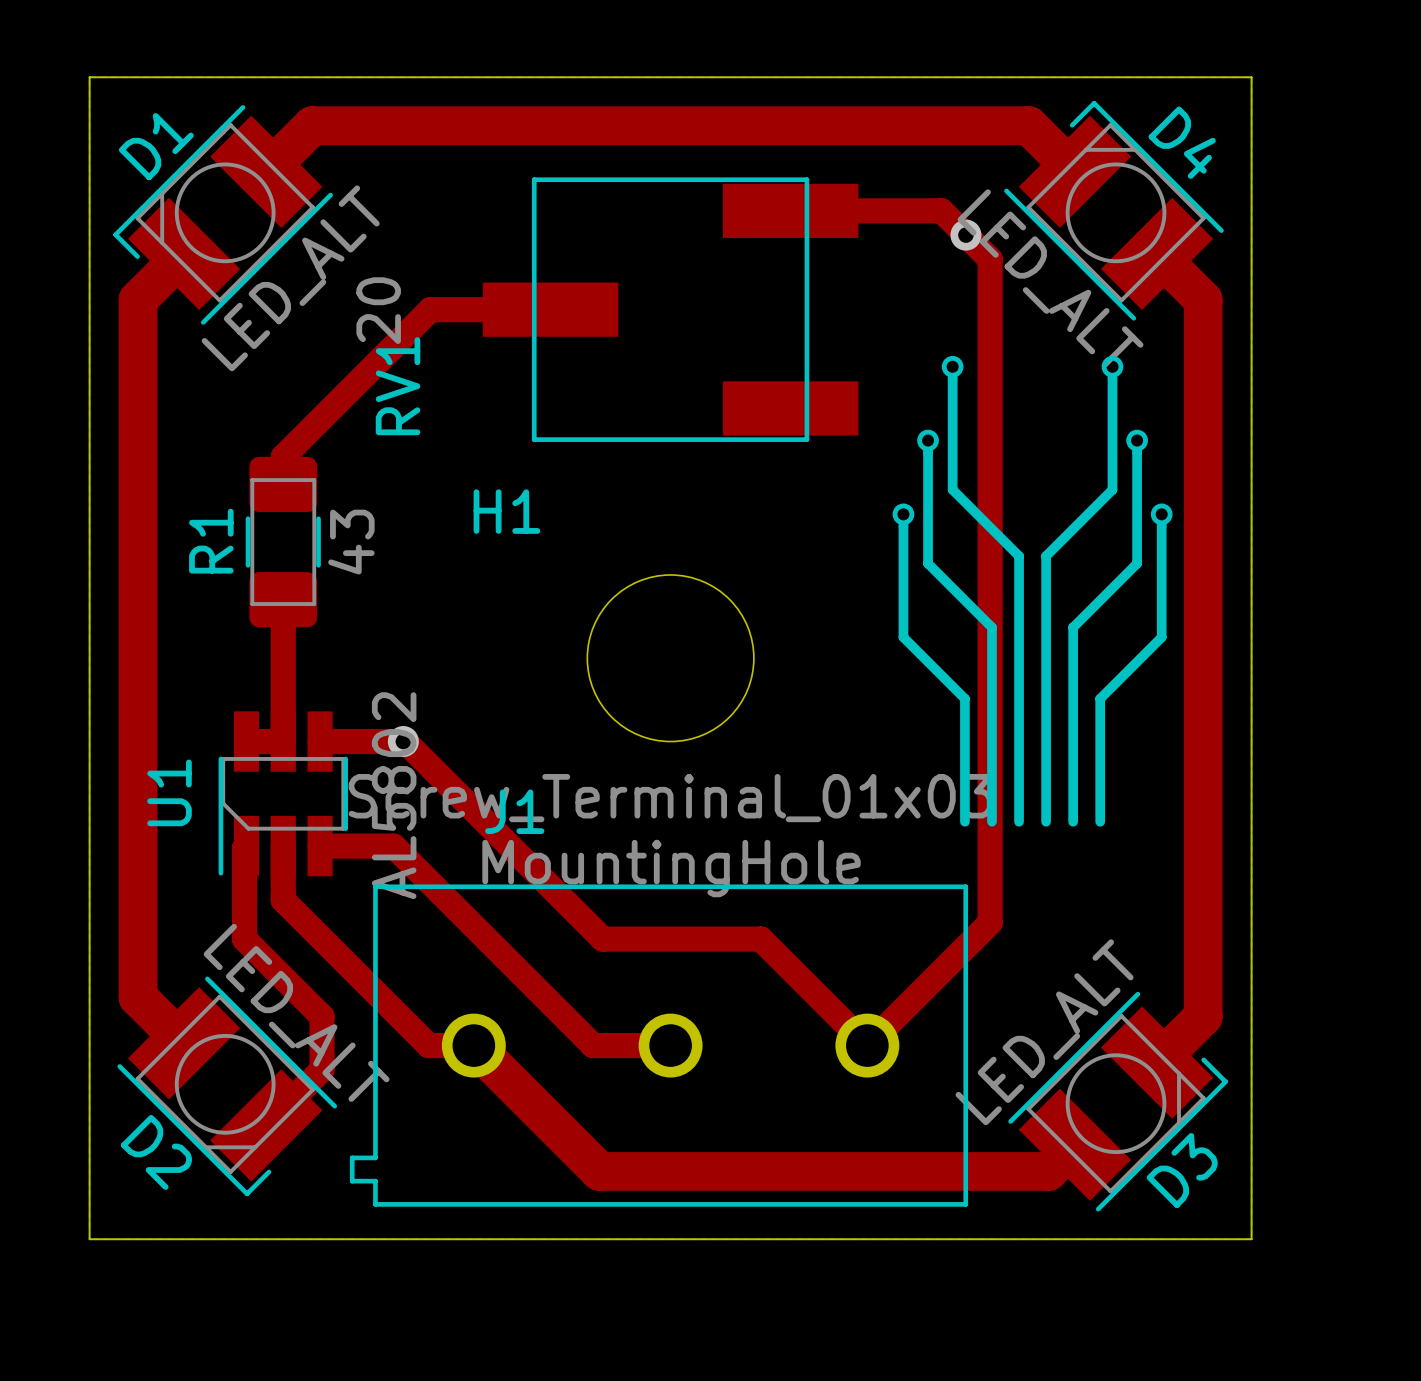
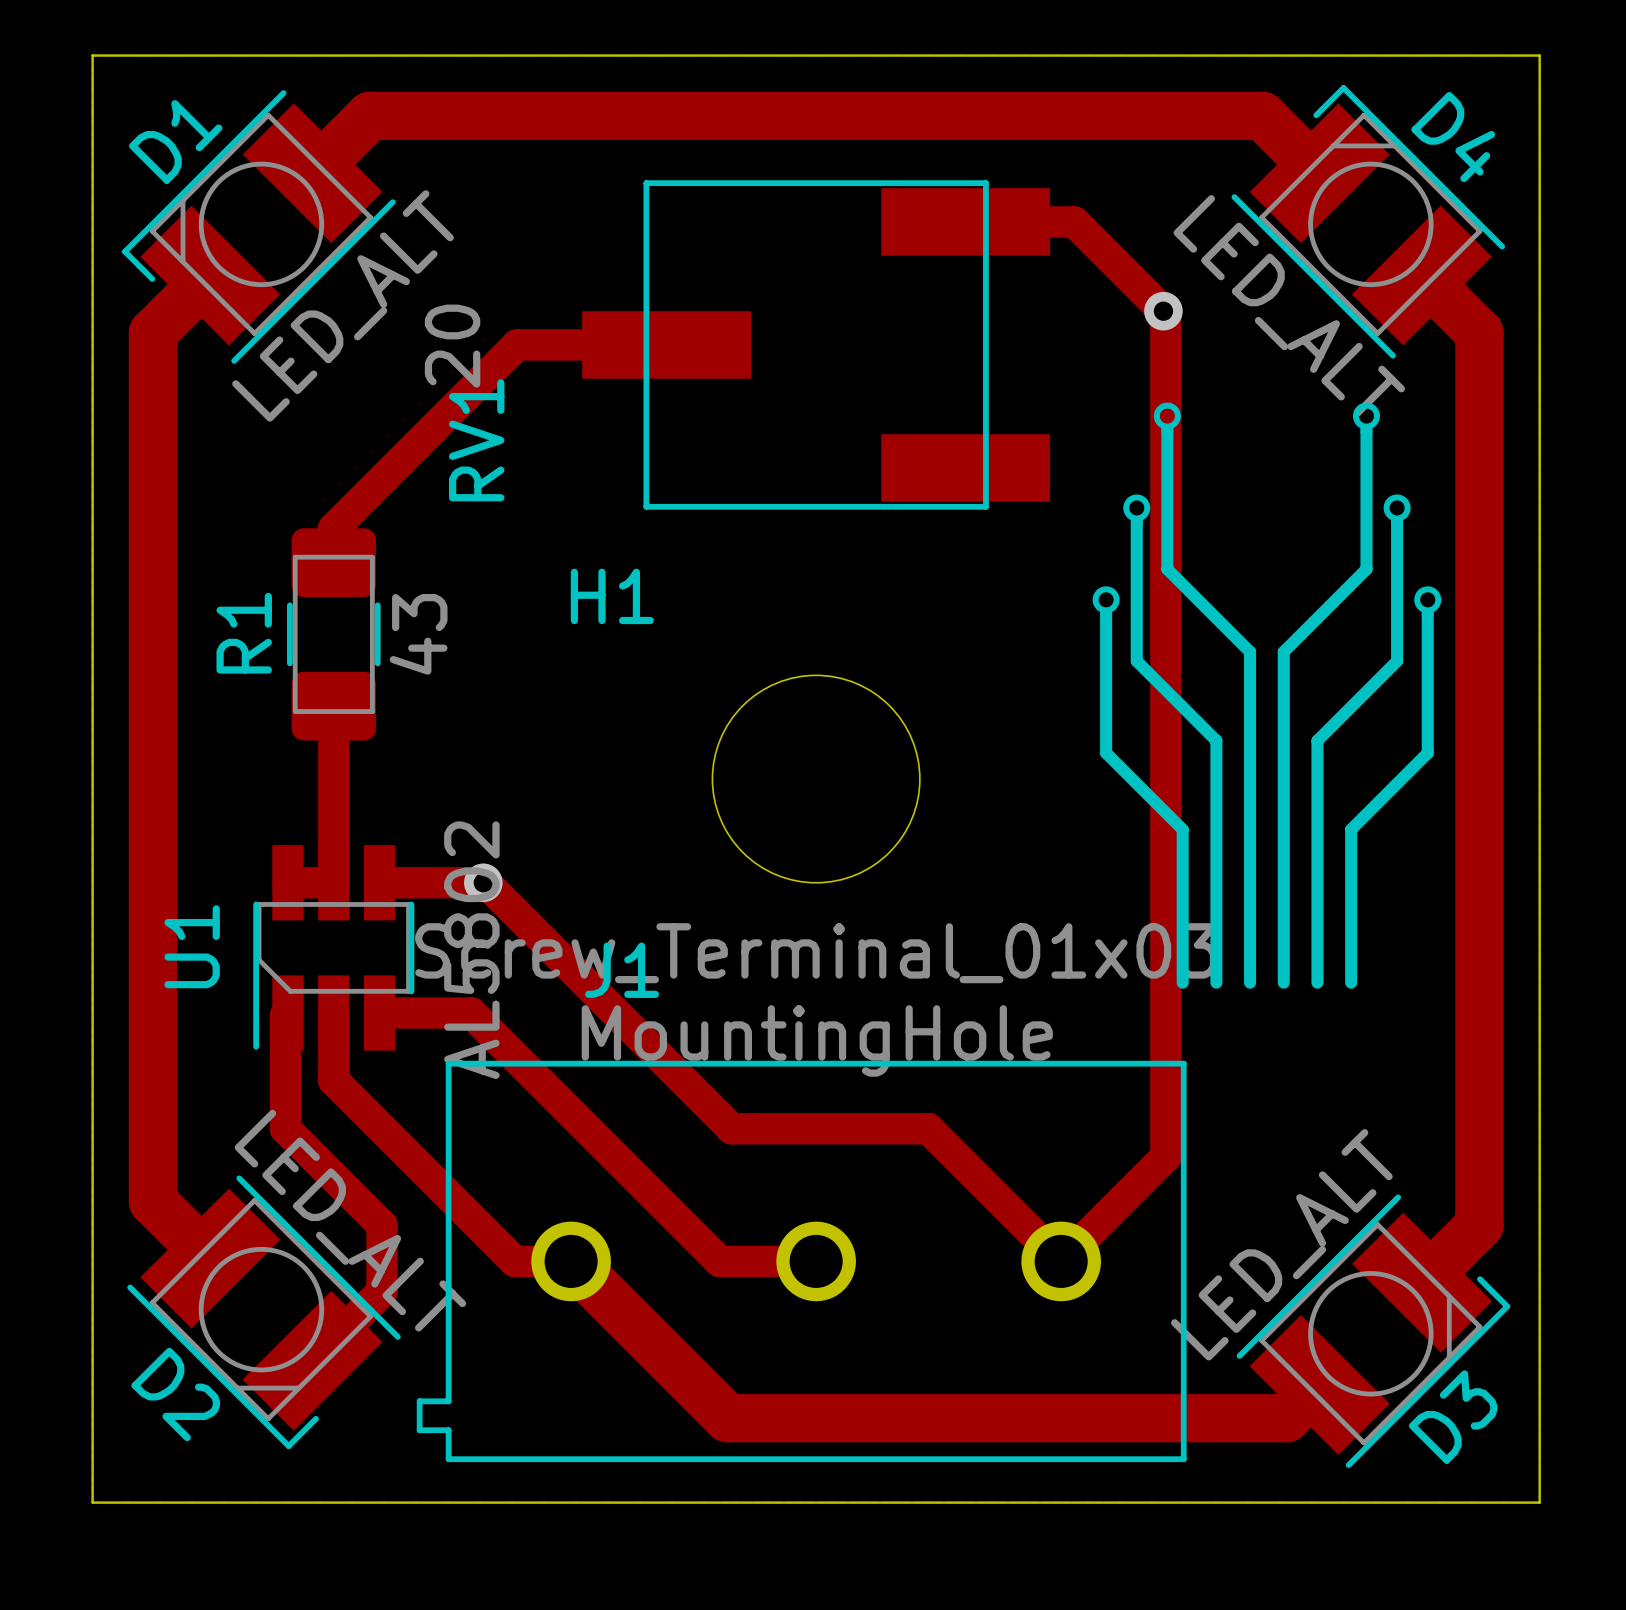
top track: (877, 210) (941, 210) (990, 259) (990, 922) (951, 961) -> (1074, 221) (1165, 313) (1165, 1156)
via position: (965, 235) -> (1163, 311)

